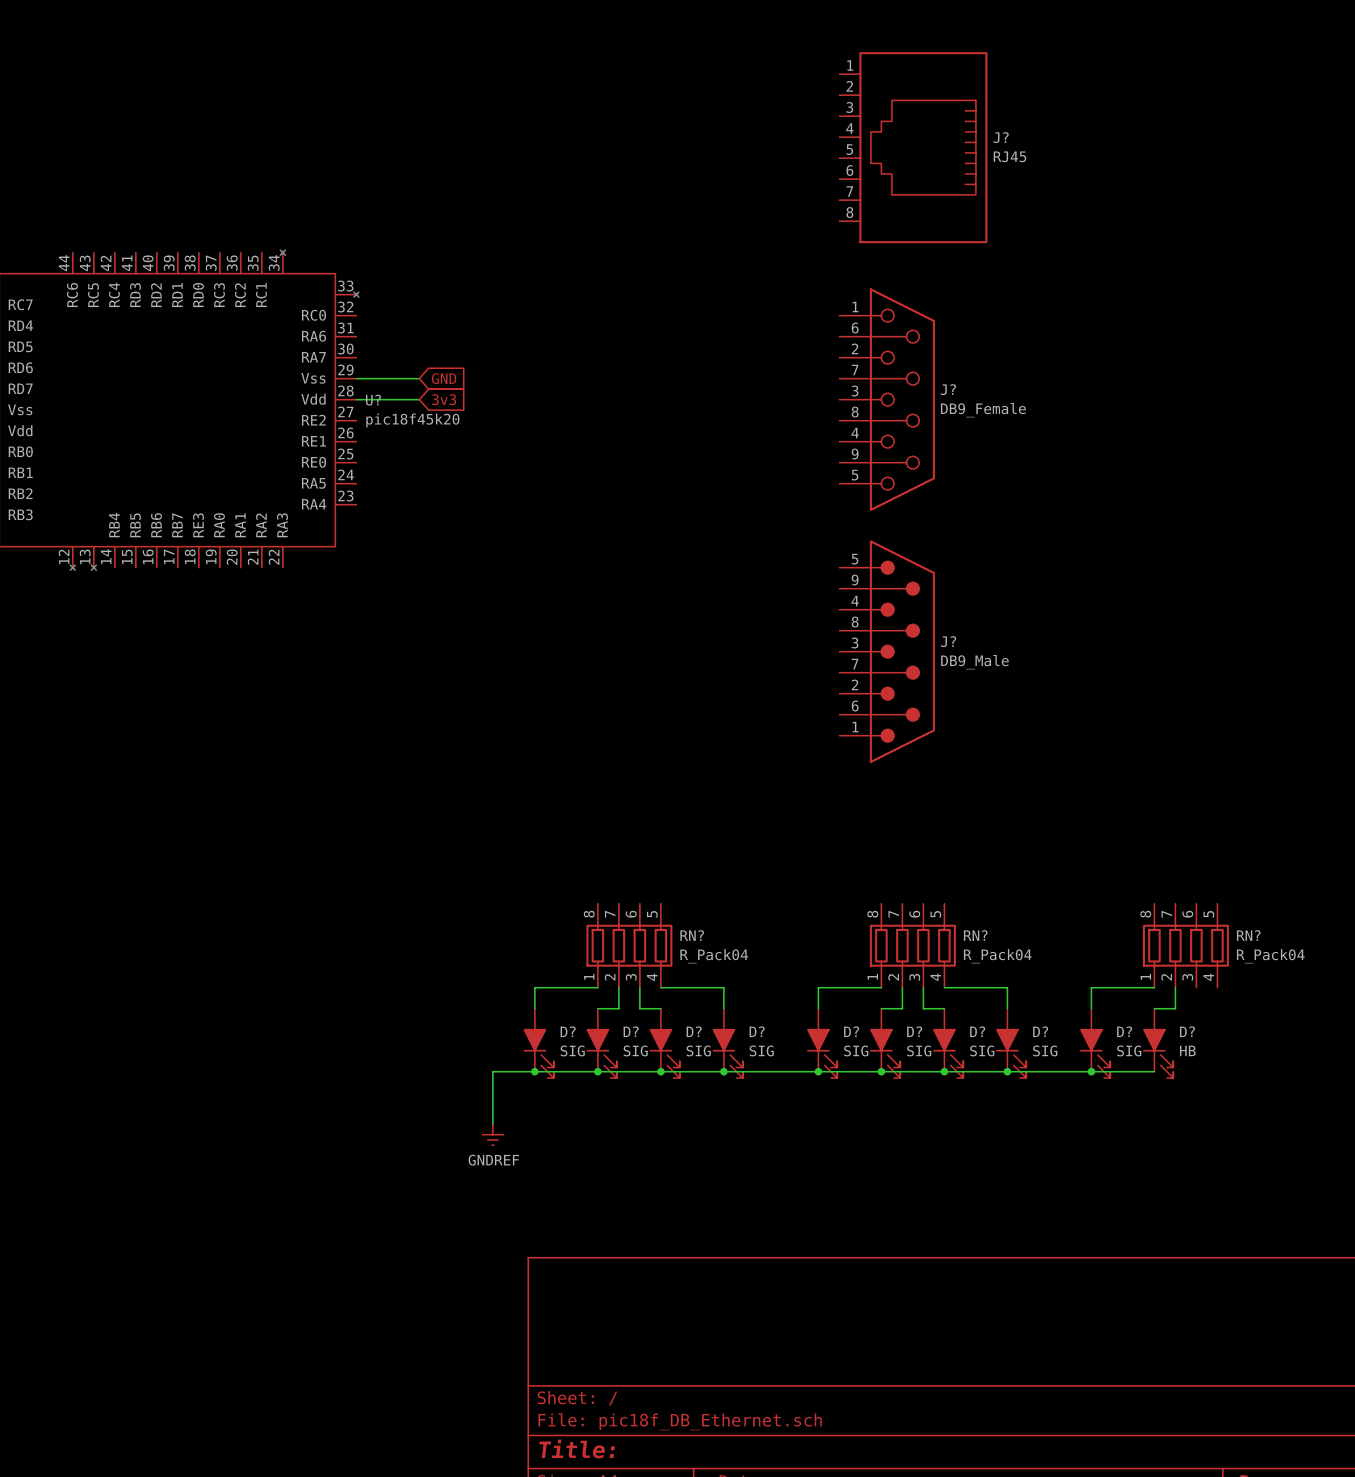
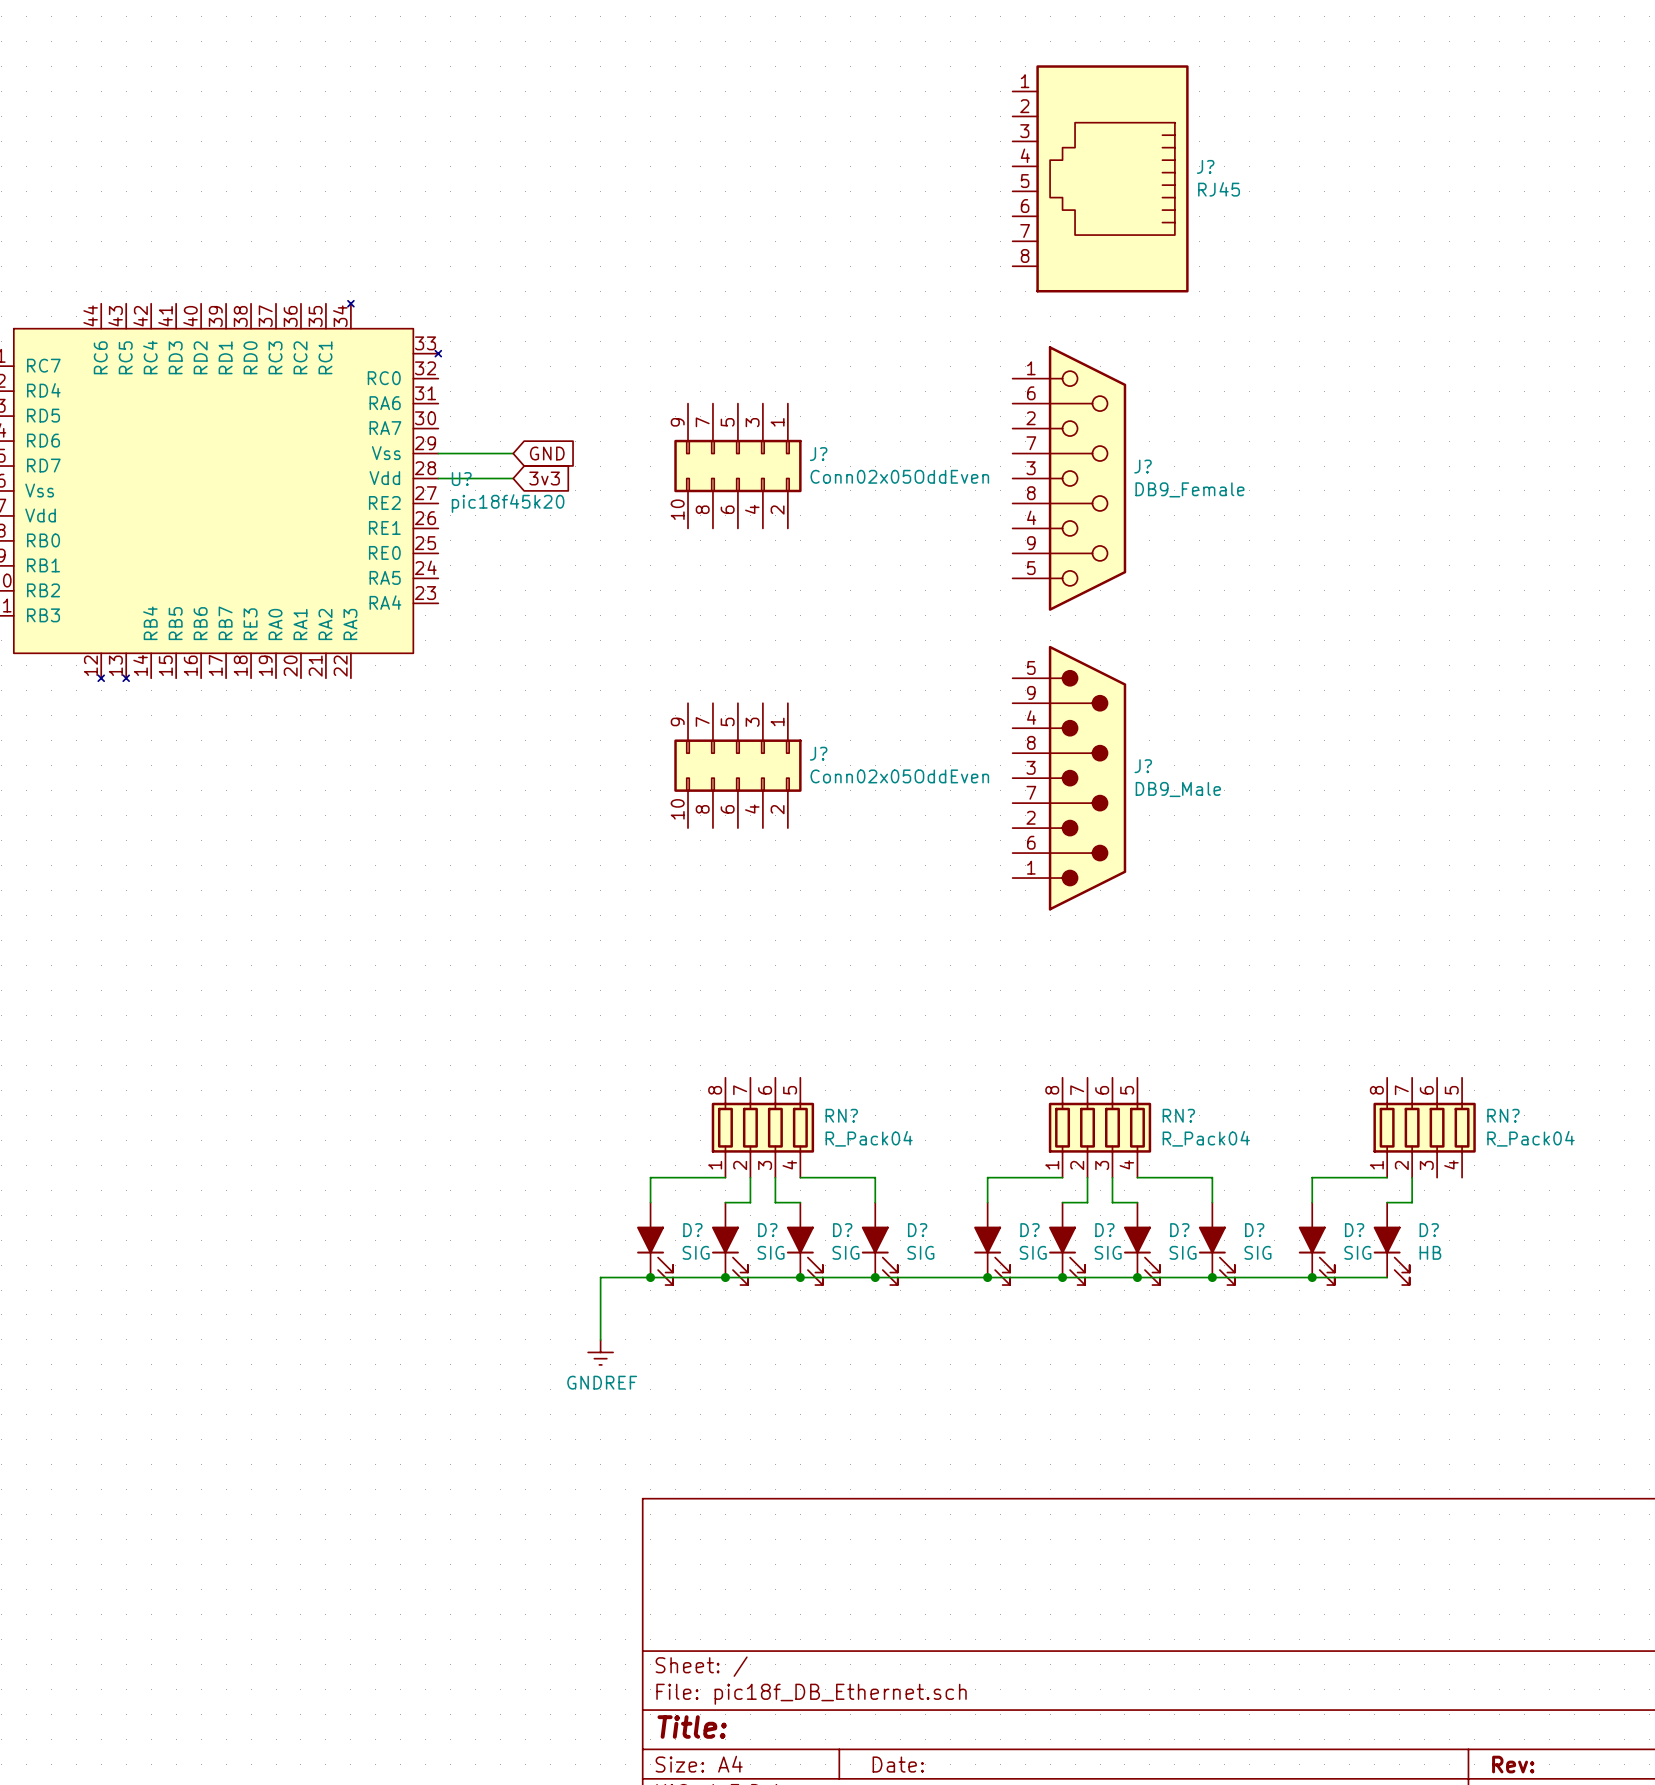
J?: none -> Conn02x05OddEven (737, 466)
J?: none -> Conn02x05OddEven (737, 765)

